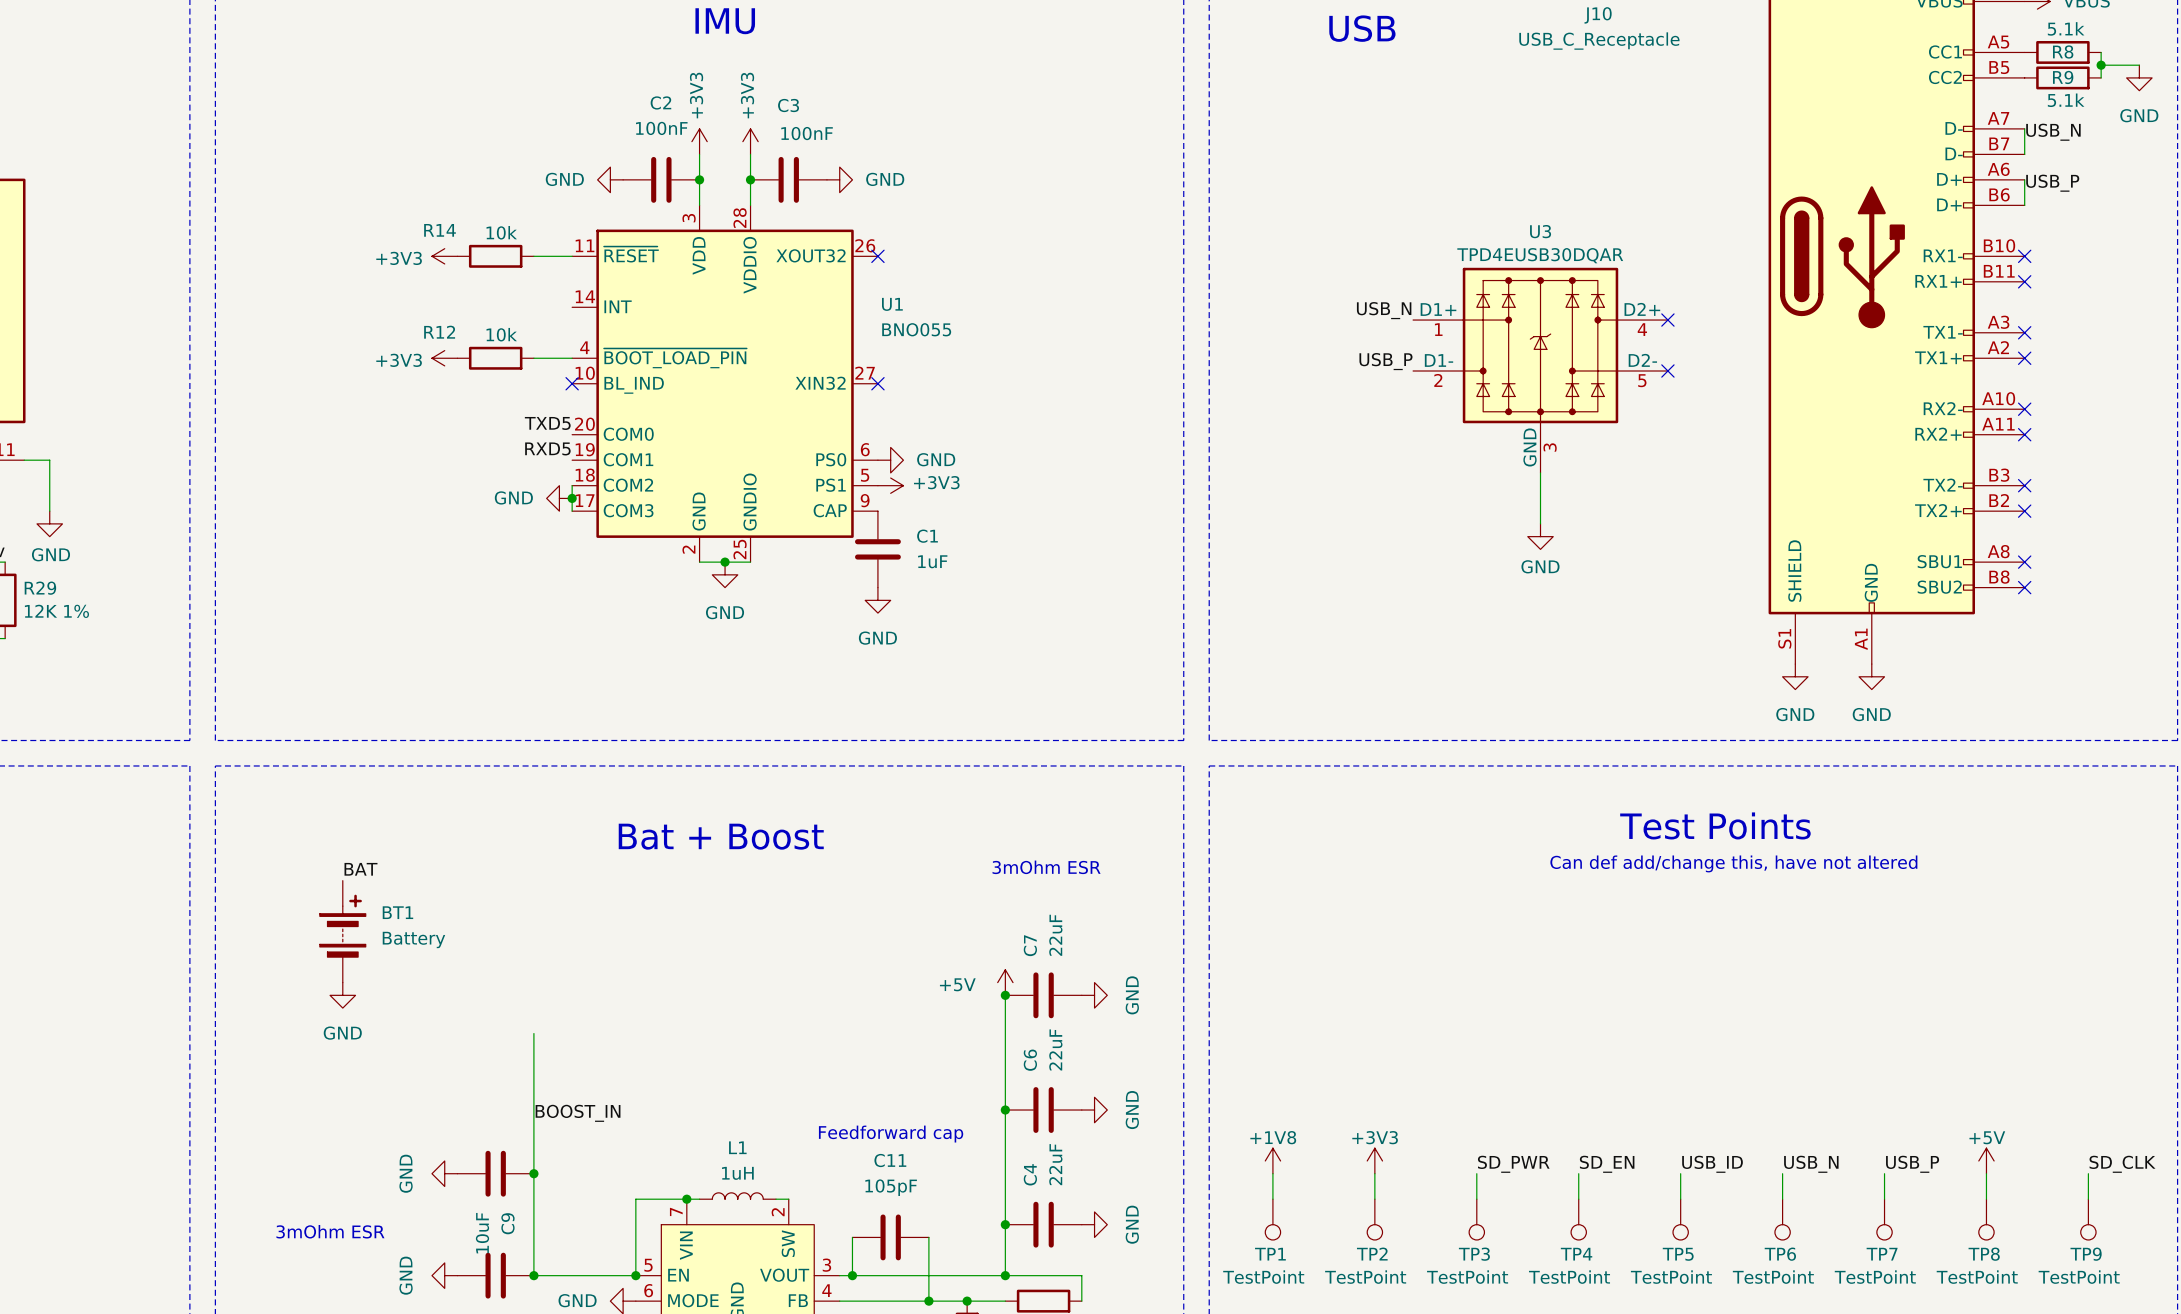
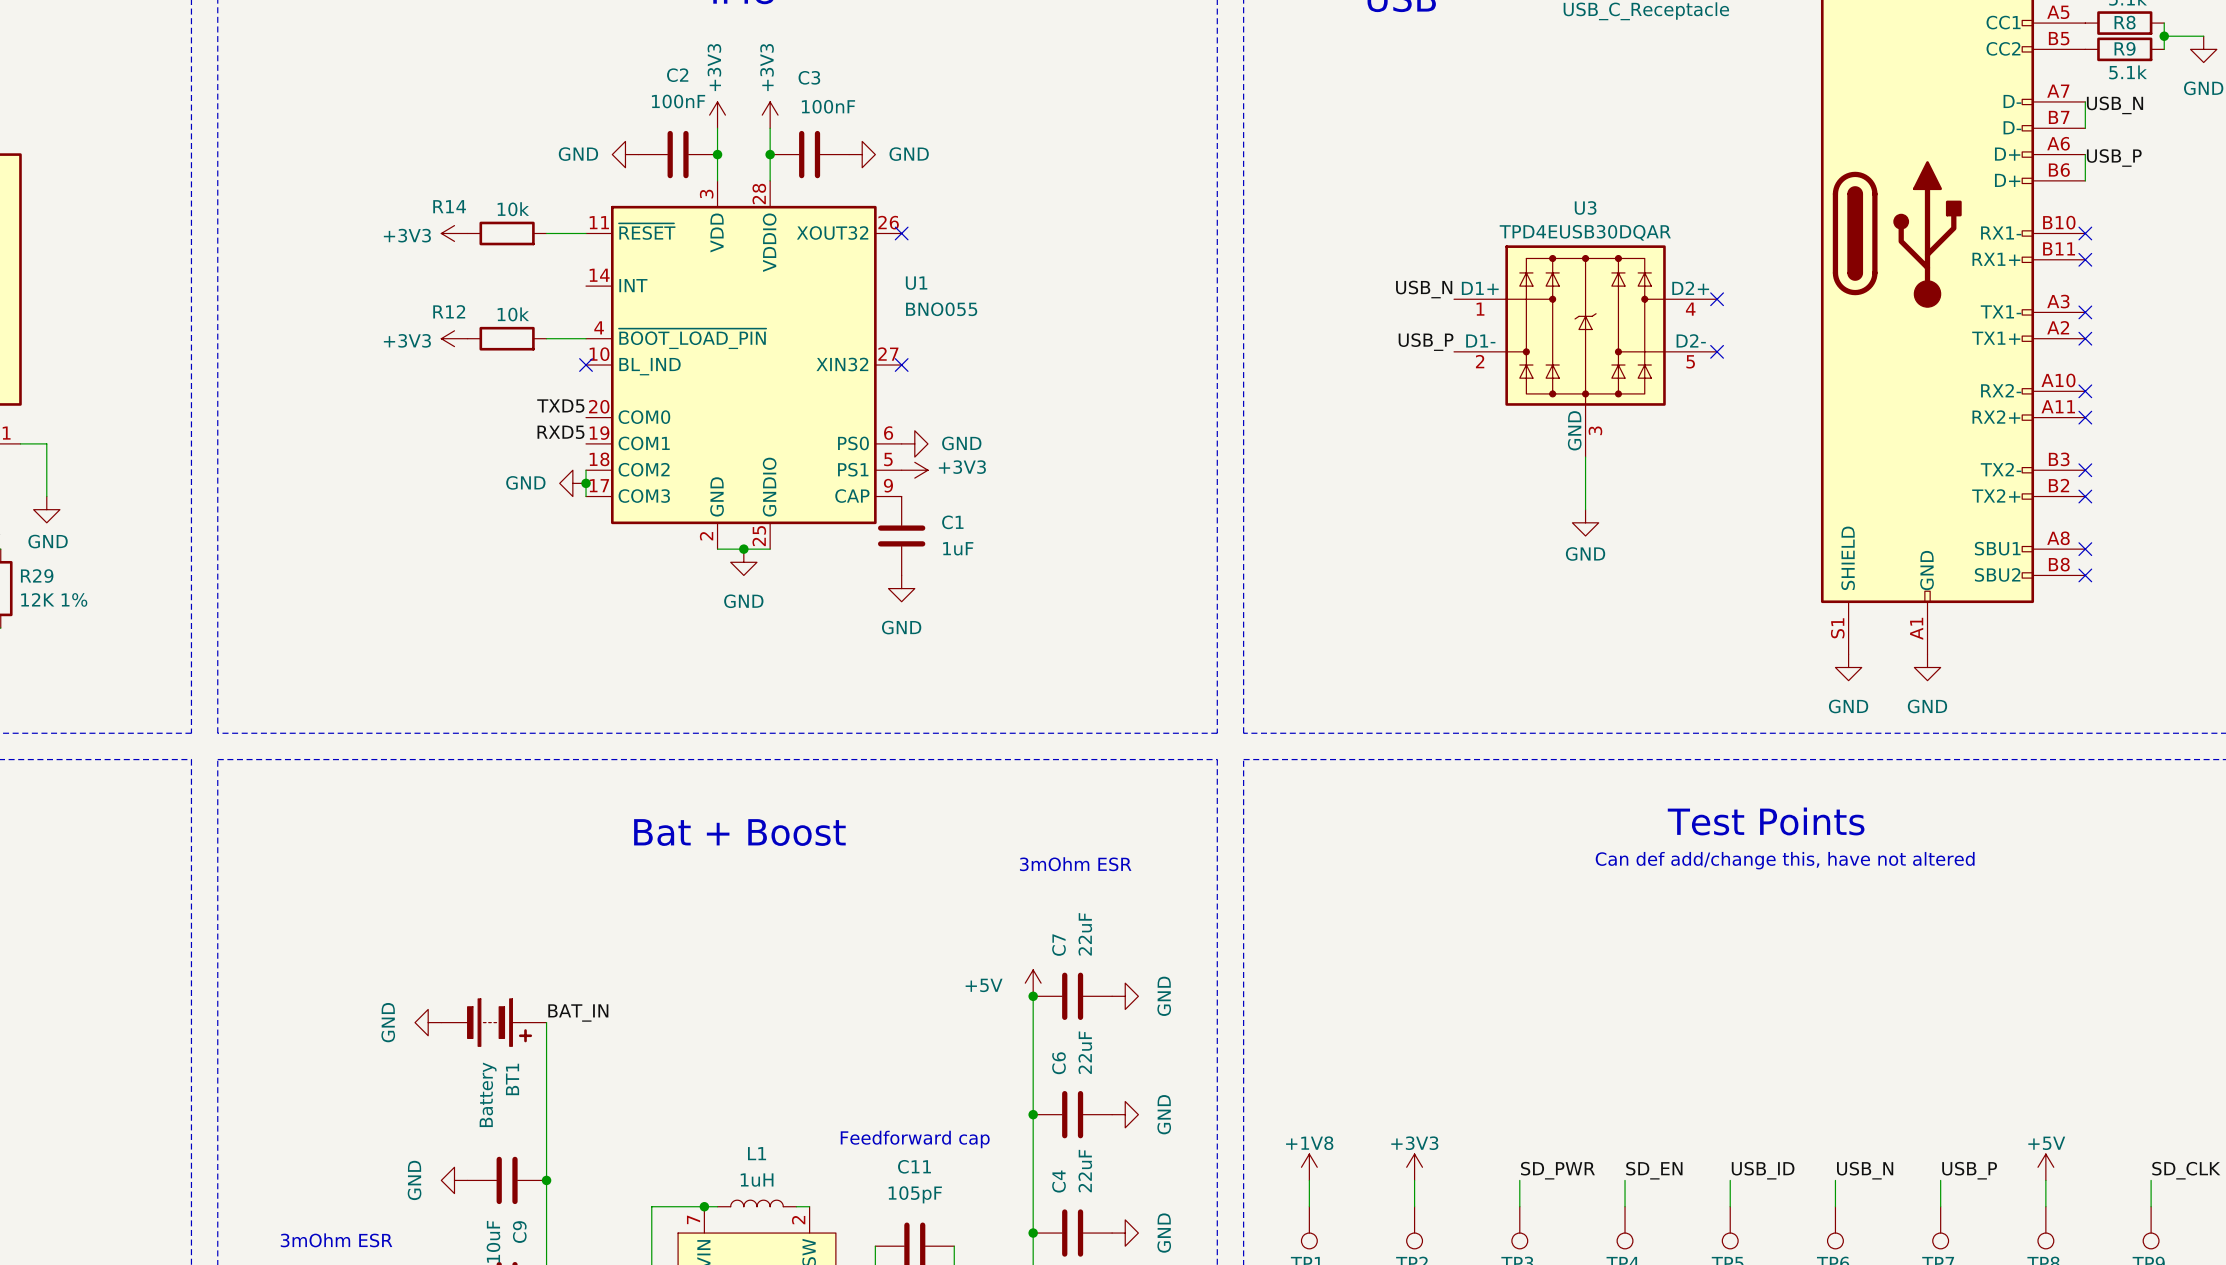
label: BAT (360, 869) -> none
BT1 rotation: 0° (342, 925) -> 90° clockwise (499, 1022)
BT1 position: (342, 931) -> (493, 1022)
power symbol rotation: 0° (342, 995) -> 90° clockwise (428, 1022)
power symbol position: GND (342, 995) -> GND (428, 1022)
label: none -> BAT_IN (578, 1012)
wire: none -> (546, 1022) (546, 1035)
label: BOOST_IN (578, 1113) -> none

